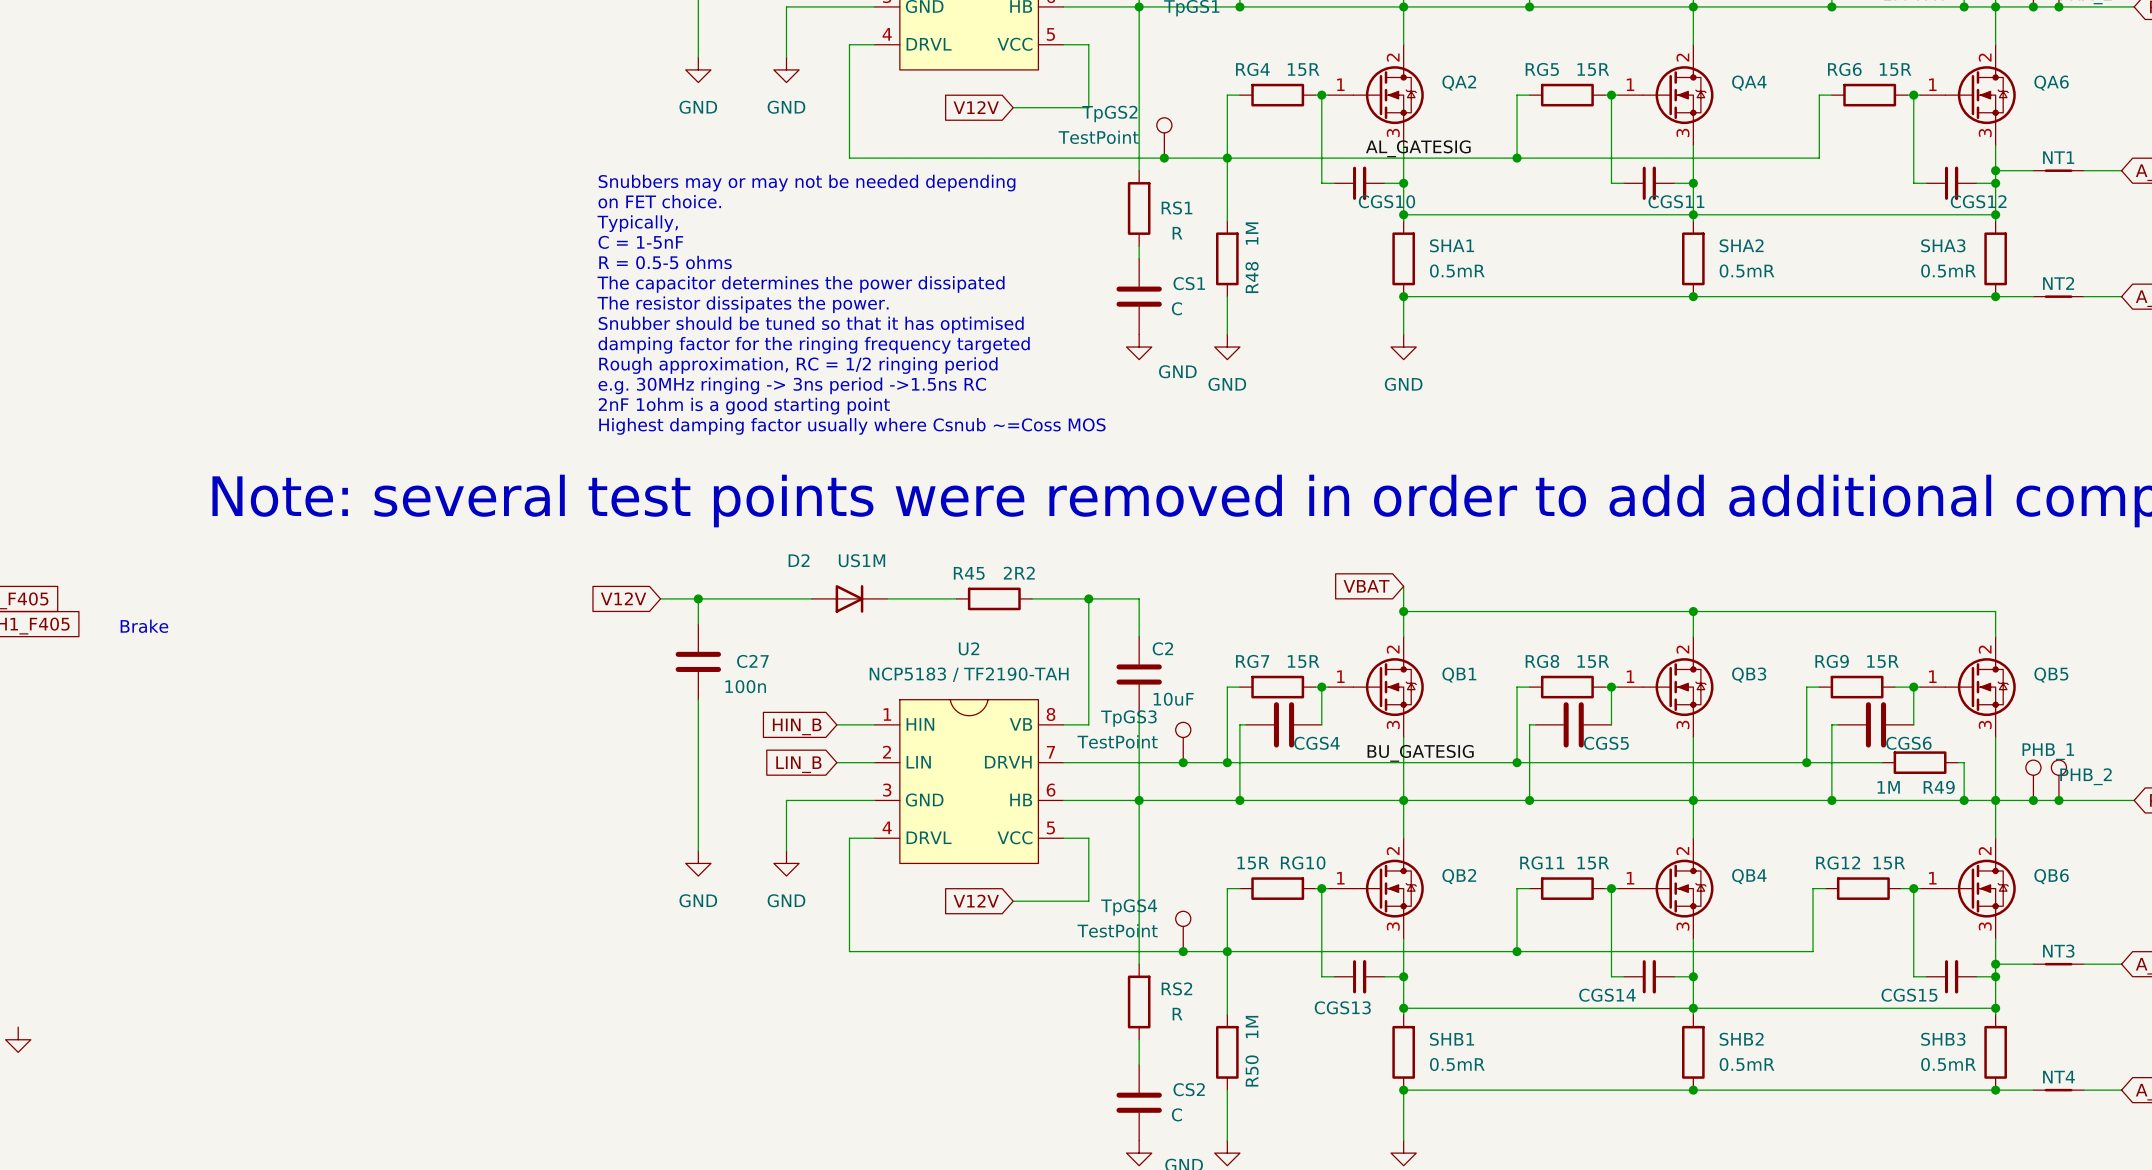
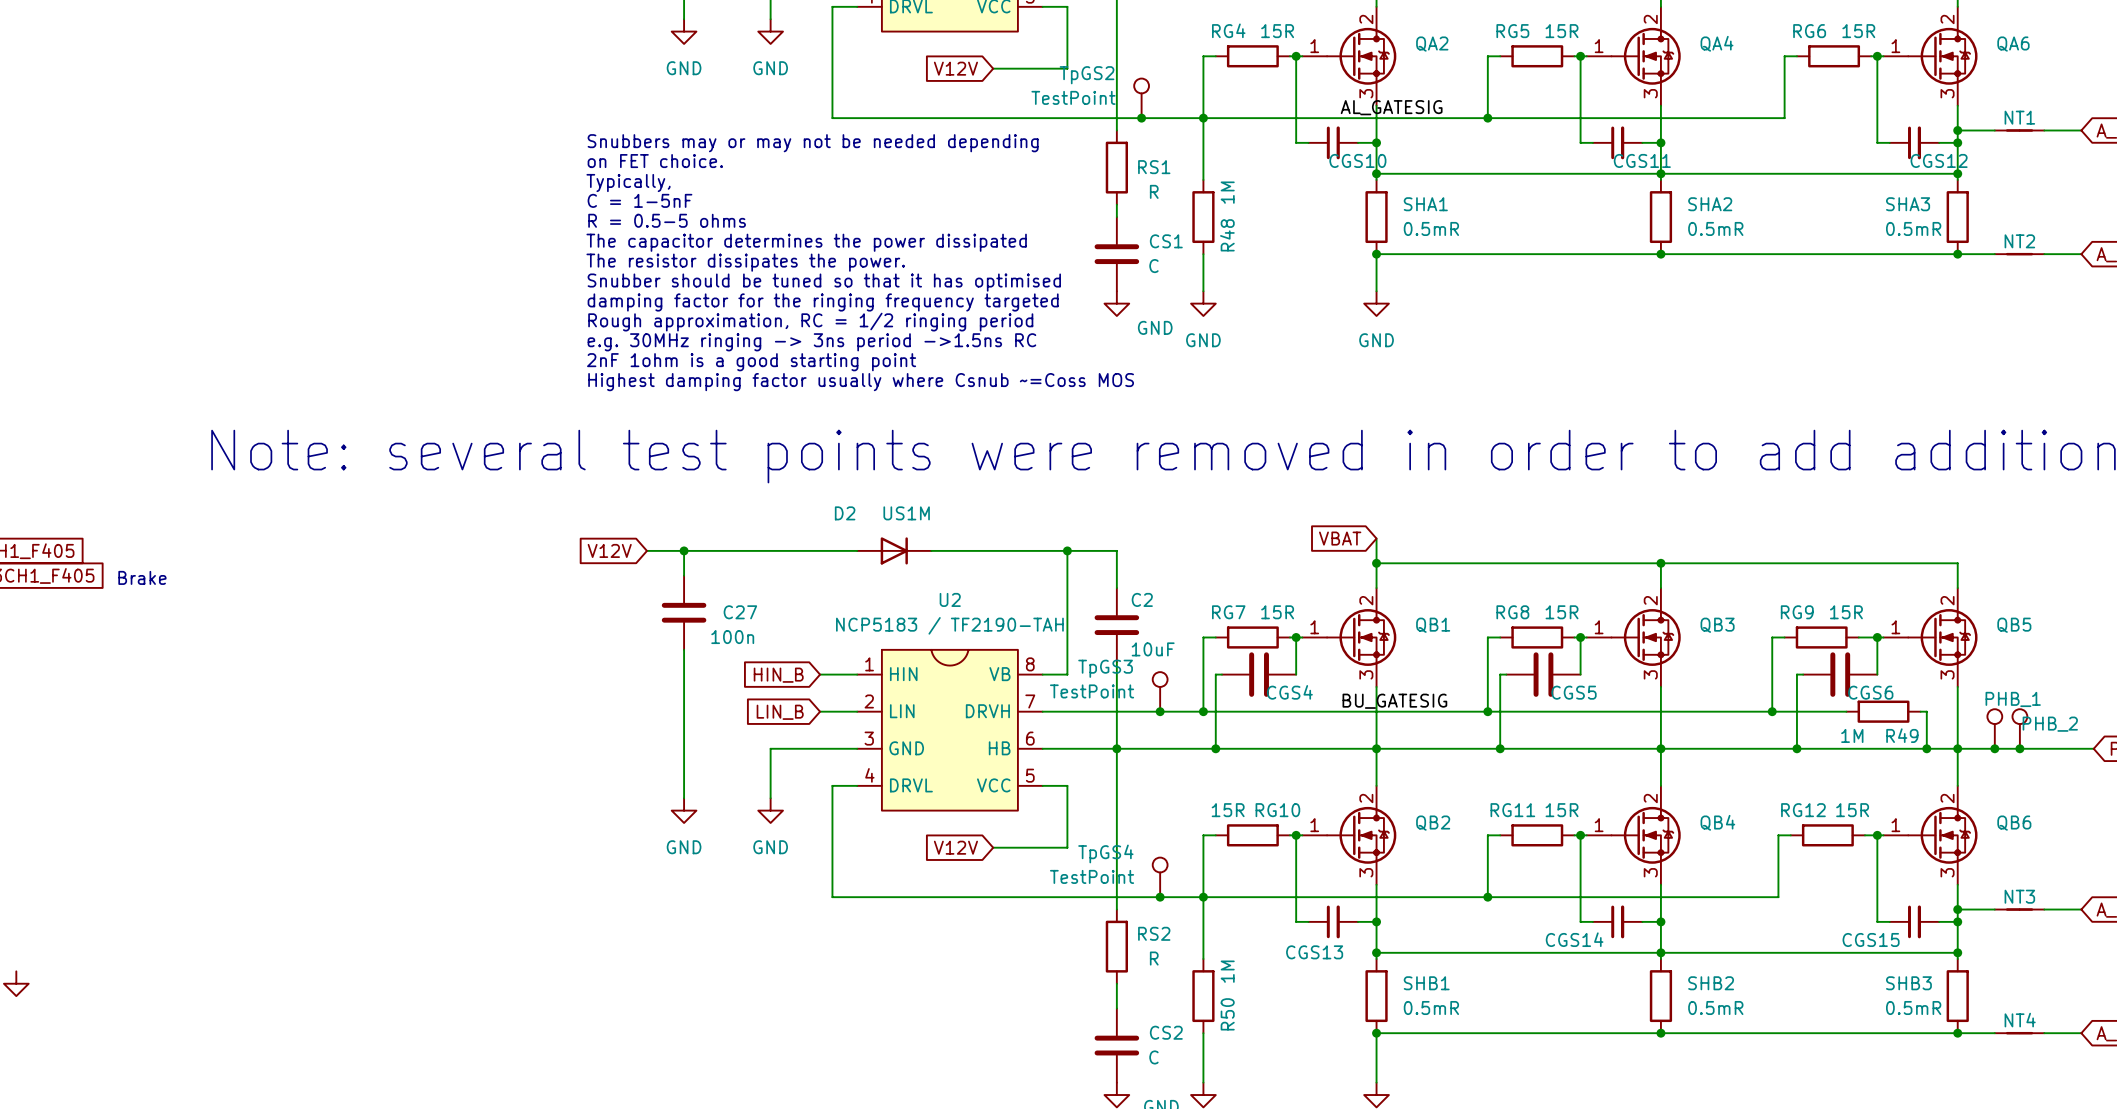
D2 position: (849, 598) -> (894, 550)
wire: none -> (937, 550) (1011, 550)
R45: 2R2 (994, 598) -> none

